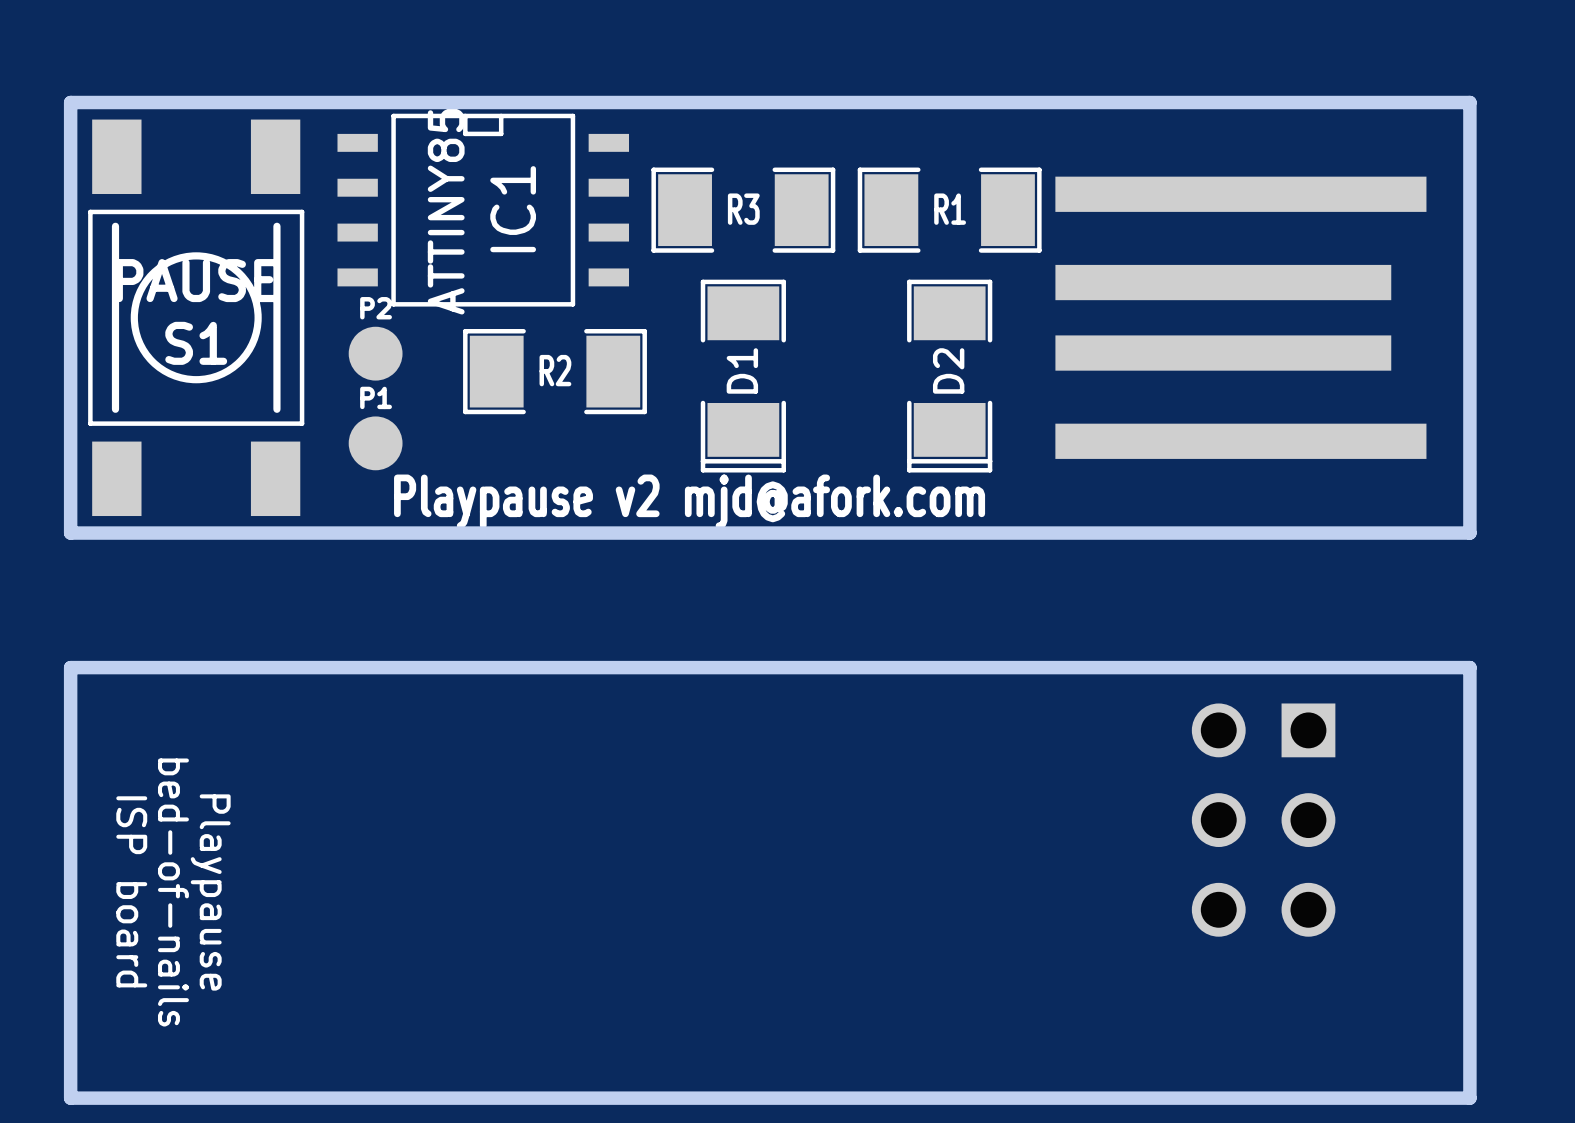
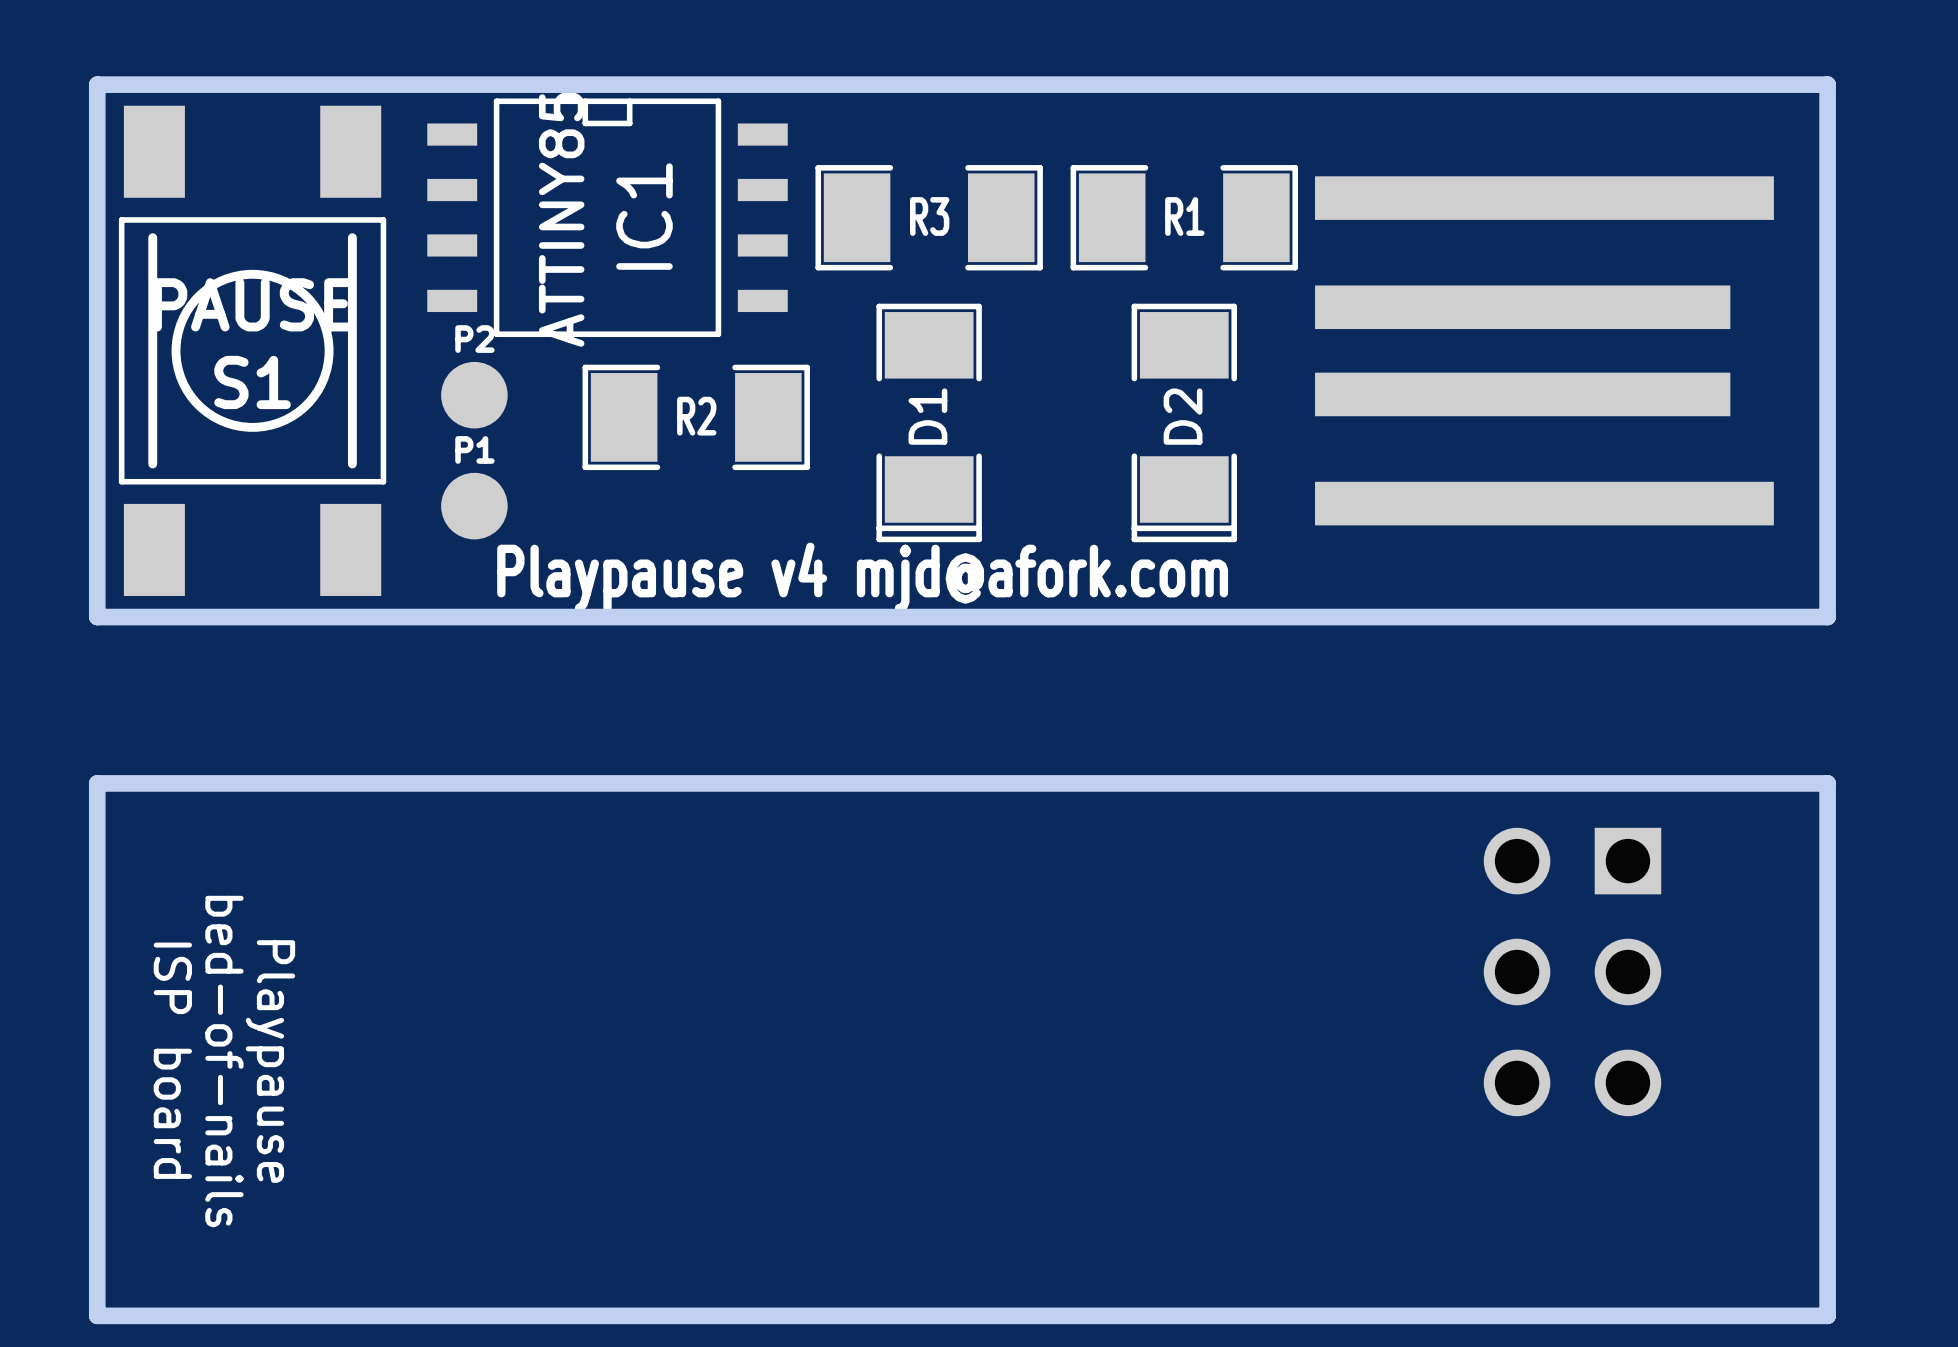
text: Playpause v2 mjd@afork.com (689, 501) -> Playpause v4 mjd@afork.com (862, 577)

